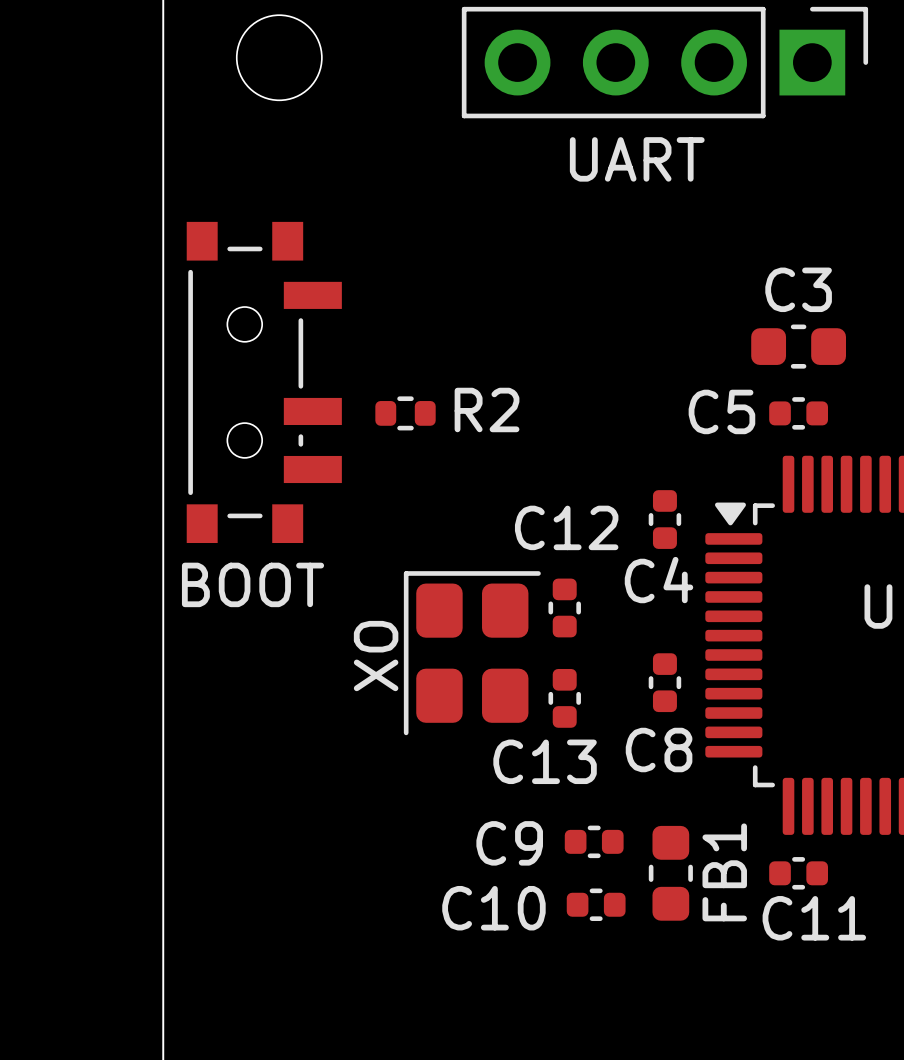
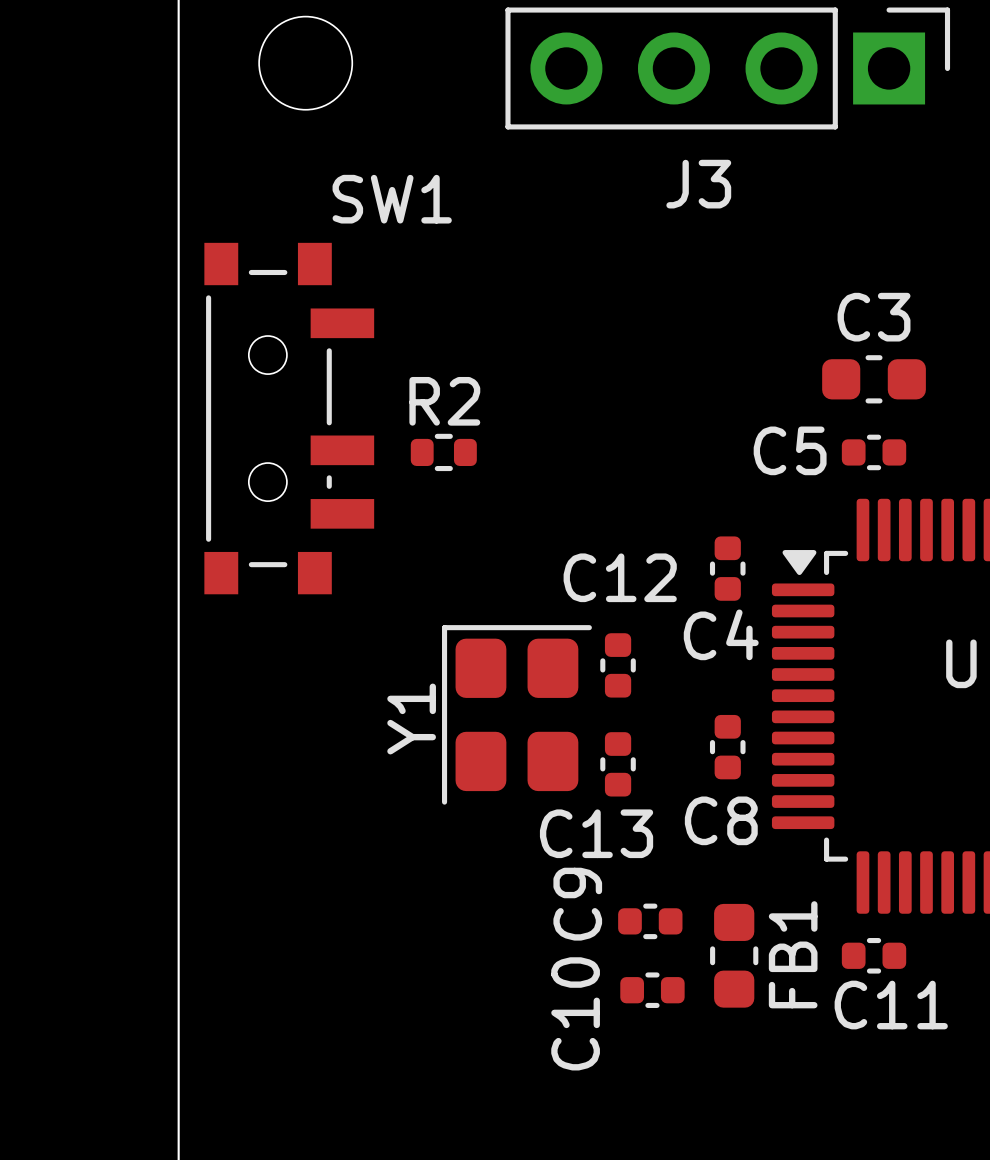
UART name: UART (637, 159) -> J3 (698, 184)
R2 name position: R2 (487, 409) -> R2 (444, 401)
BOOT name: BOOT (253, 584) -> SW1 (392, 199)
XO name: XO (376, 656) -> Y1 (411, 719)
C9 name rotation: 0° (509, 843) -> 90° counterclockwise (577, 904)
C10 name rotation: 0° (493, 908) -> 90° counterclockwise (575, 1013)

